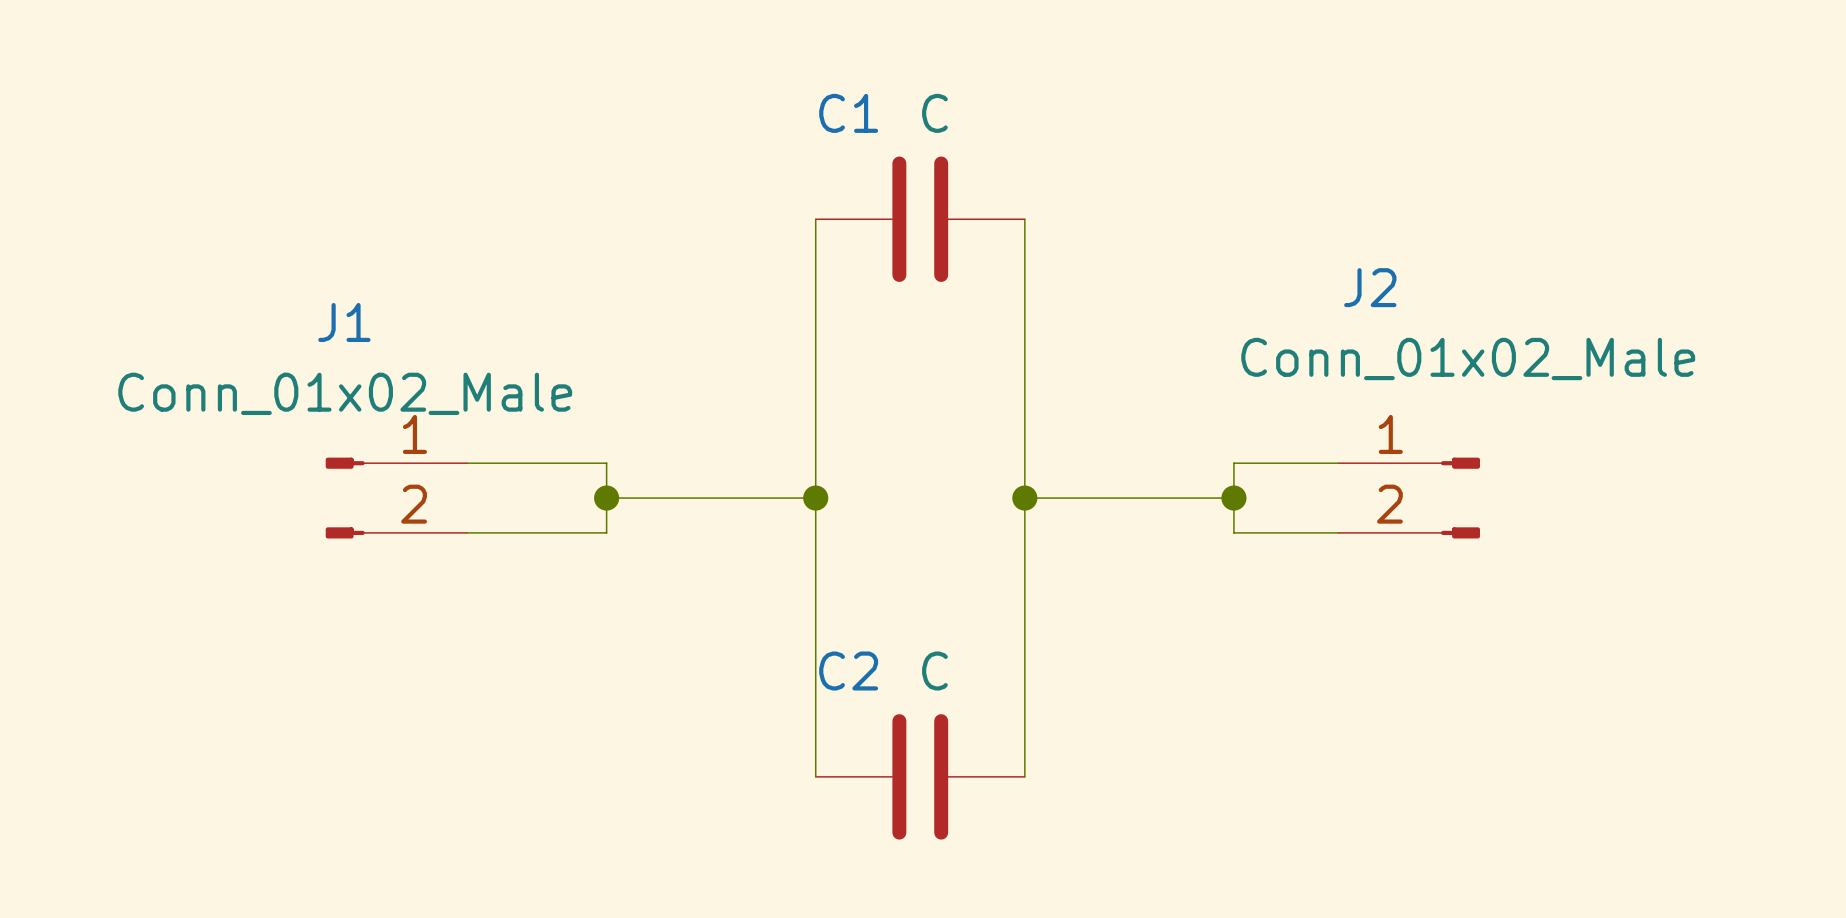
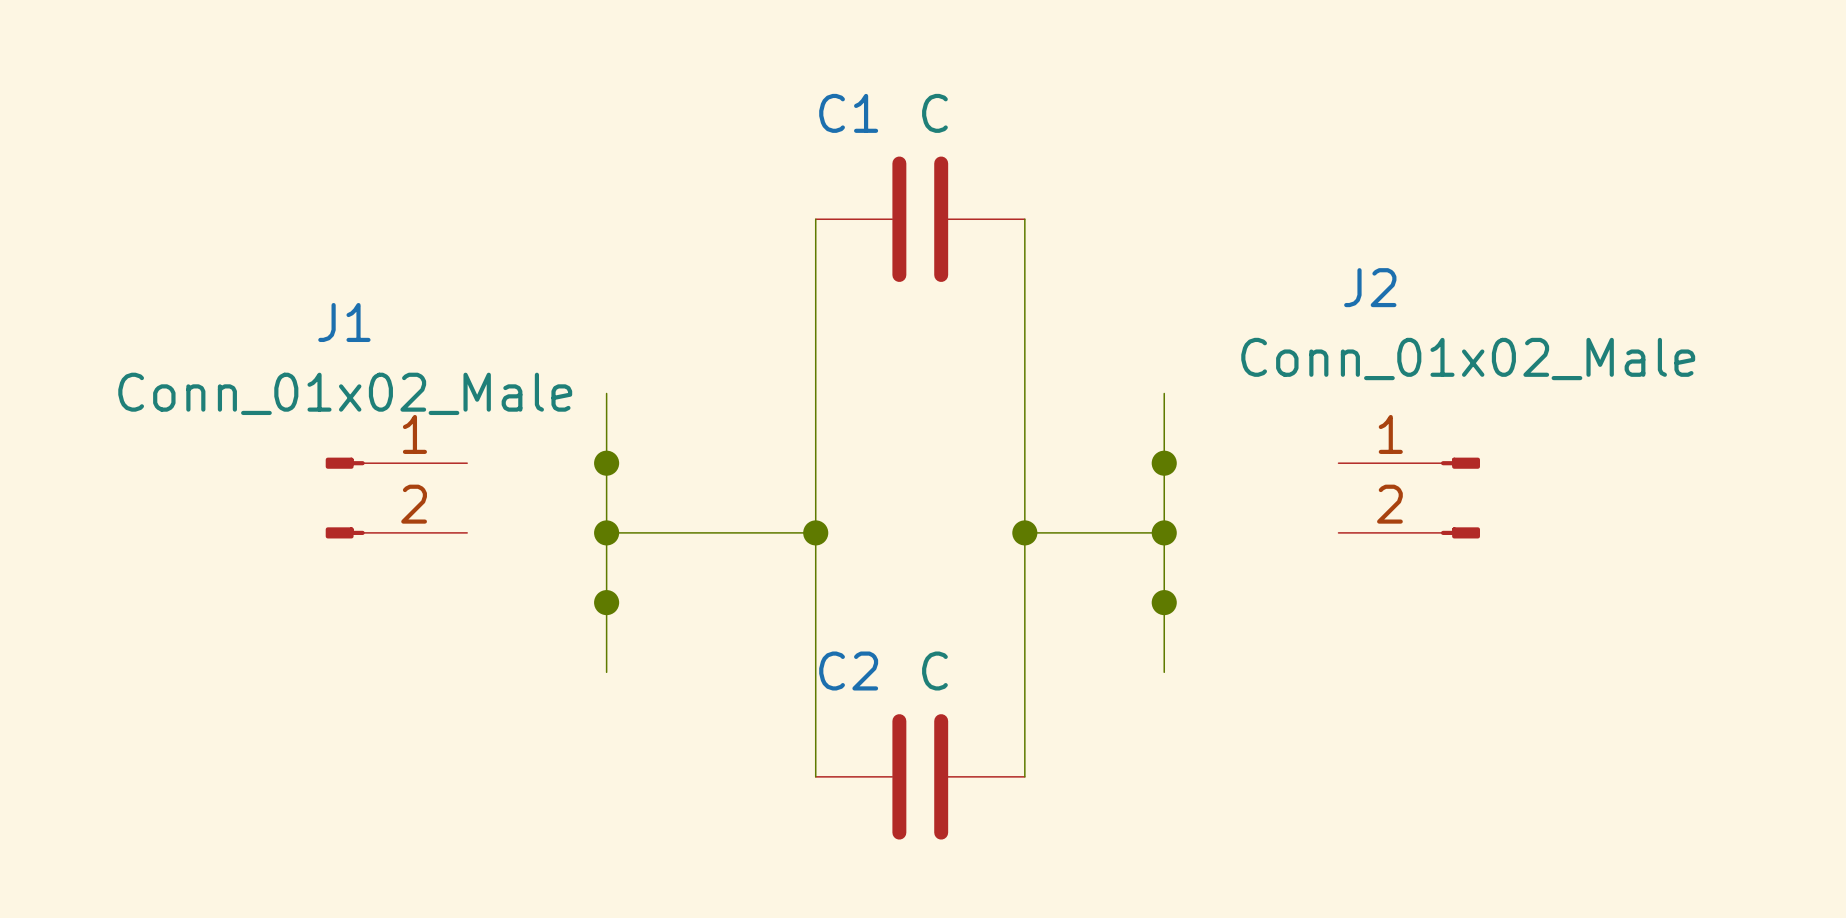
wire: none -> (1164, 393) (1164, 672)
wire: (467, 463) (606, 463) -> (606, 393) (606, 463)
junction: none -> (606, 463)
junction: none -> (1164, 463)
wire: (1338, 463) (1233, 463) (1233, 532) (1338, 532) -> none
wire: (606, 498) (815, 498) -> none
junction: (606, 498) -> none
junction position: (815, 498) -> (815, 532)
wire: (1024, 498) (1233, 498) -> none
junction position: (1024, 498) -> (1024, 532)
junction: (1233, 498) -> none
wire: (467, 532) (606, 532) -> (1024, 532) (1164, 532)
junction: none -> (606, 532)
wire: none -> (815, 532) (606, 532) (606, 672)
junction: none -> (1164, 532)
junction: none -> (606, 602)
junction: none -> (1164, 602)

